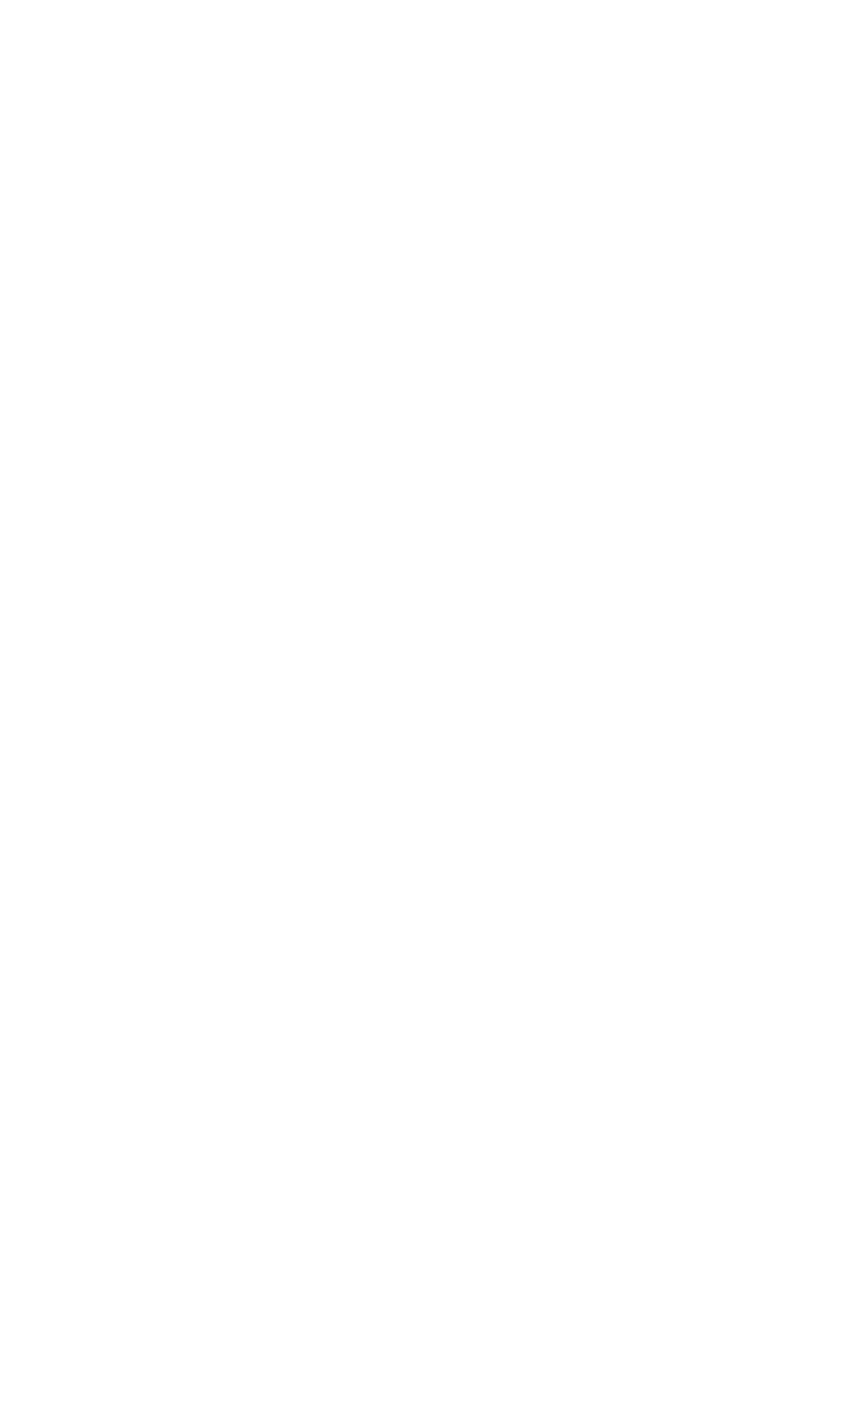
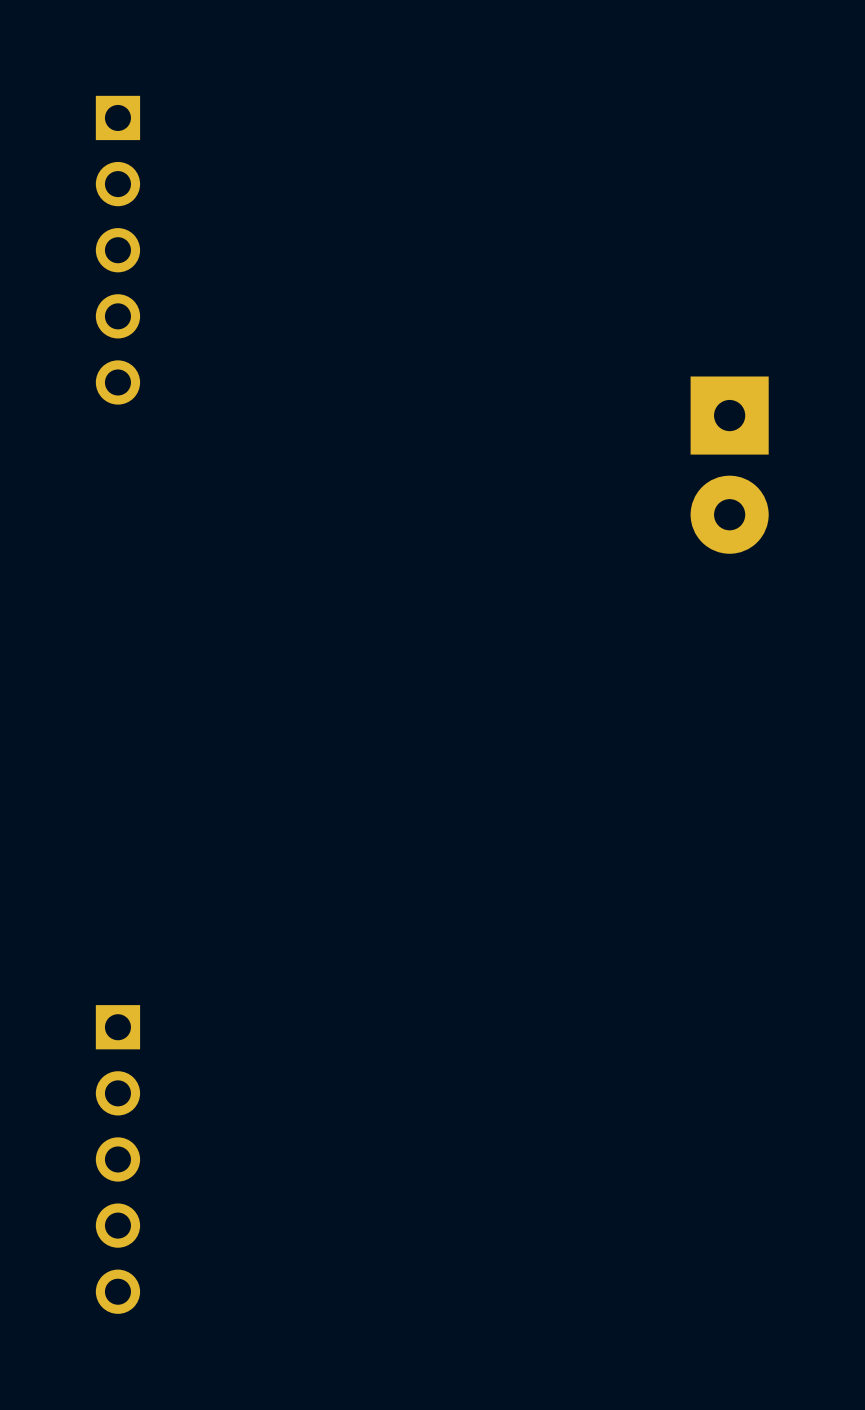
part: none -> (117, 250)
part: none -> (729, 465)
part: none -> (117, 1159)

